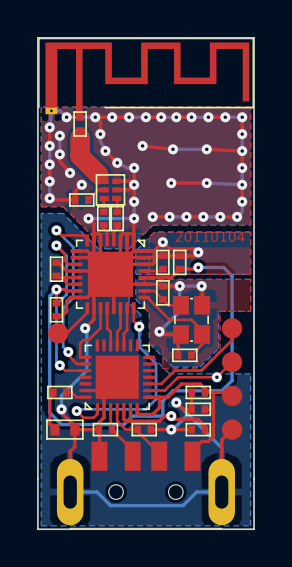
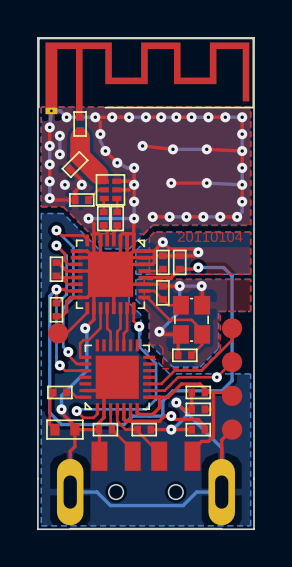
top track: (59, 154) (59, 161) (69, 172) -> none
part: none -> (75, 164)
top track: none -> (70, 169) (81, 180) (81, 184)
via position: (69, 172) -> (64, 184)

